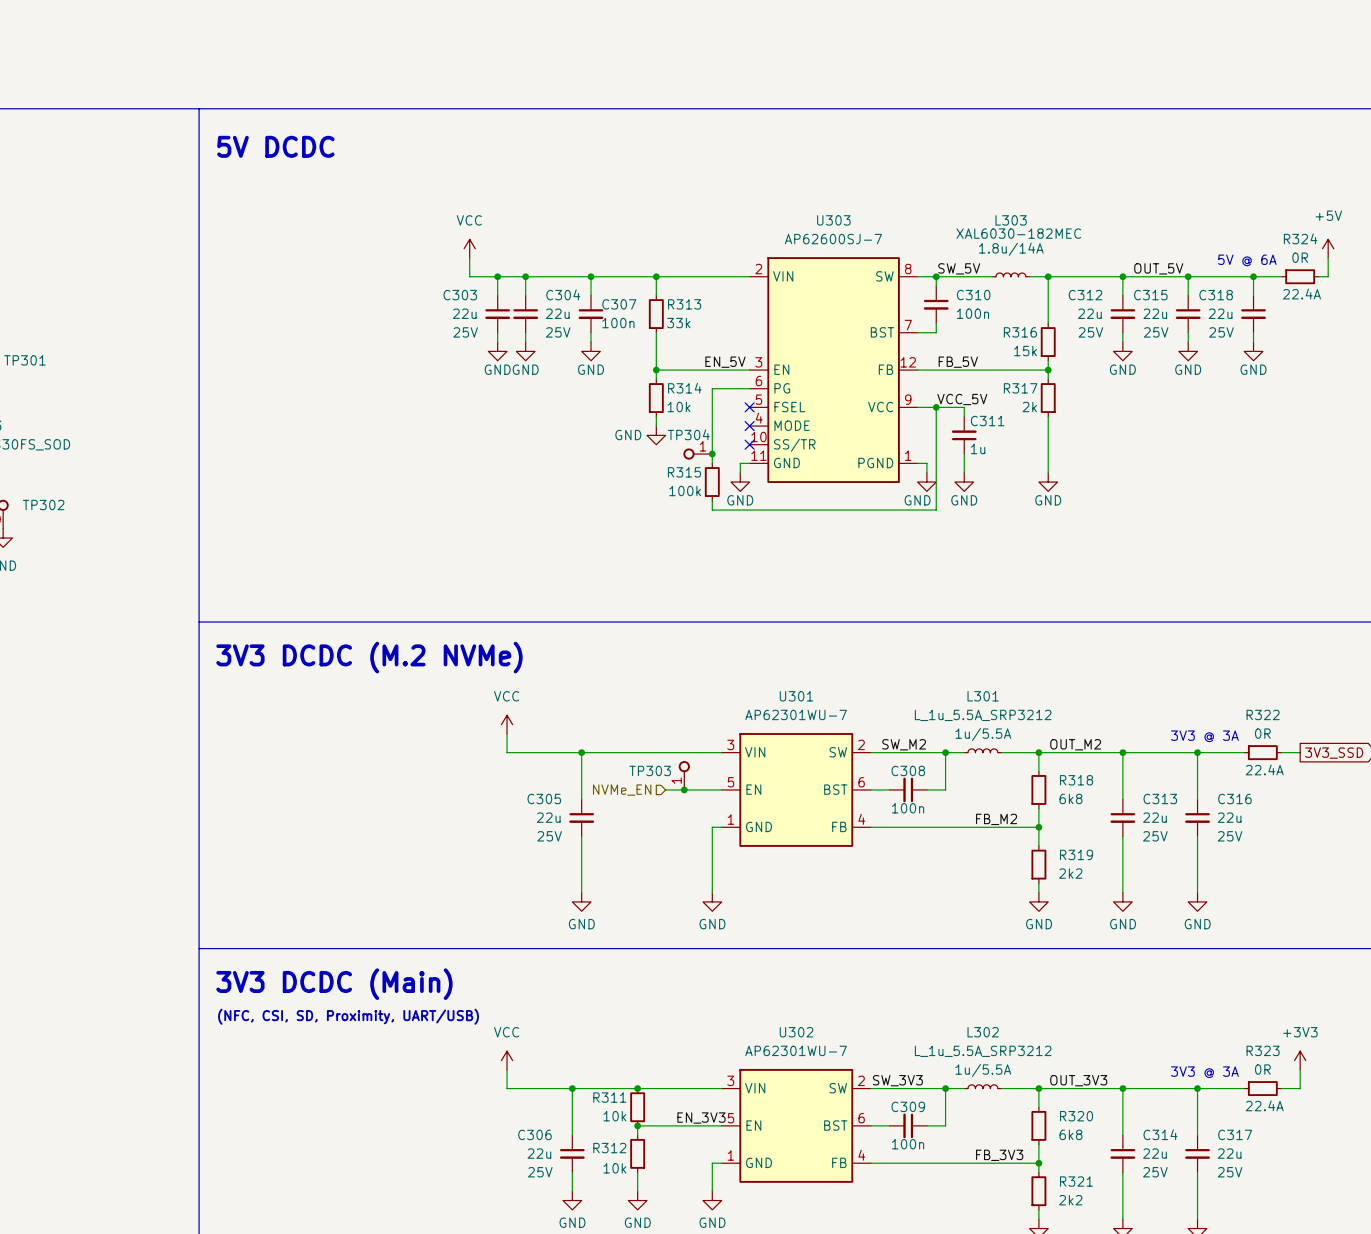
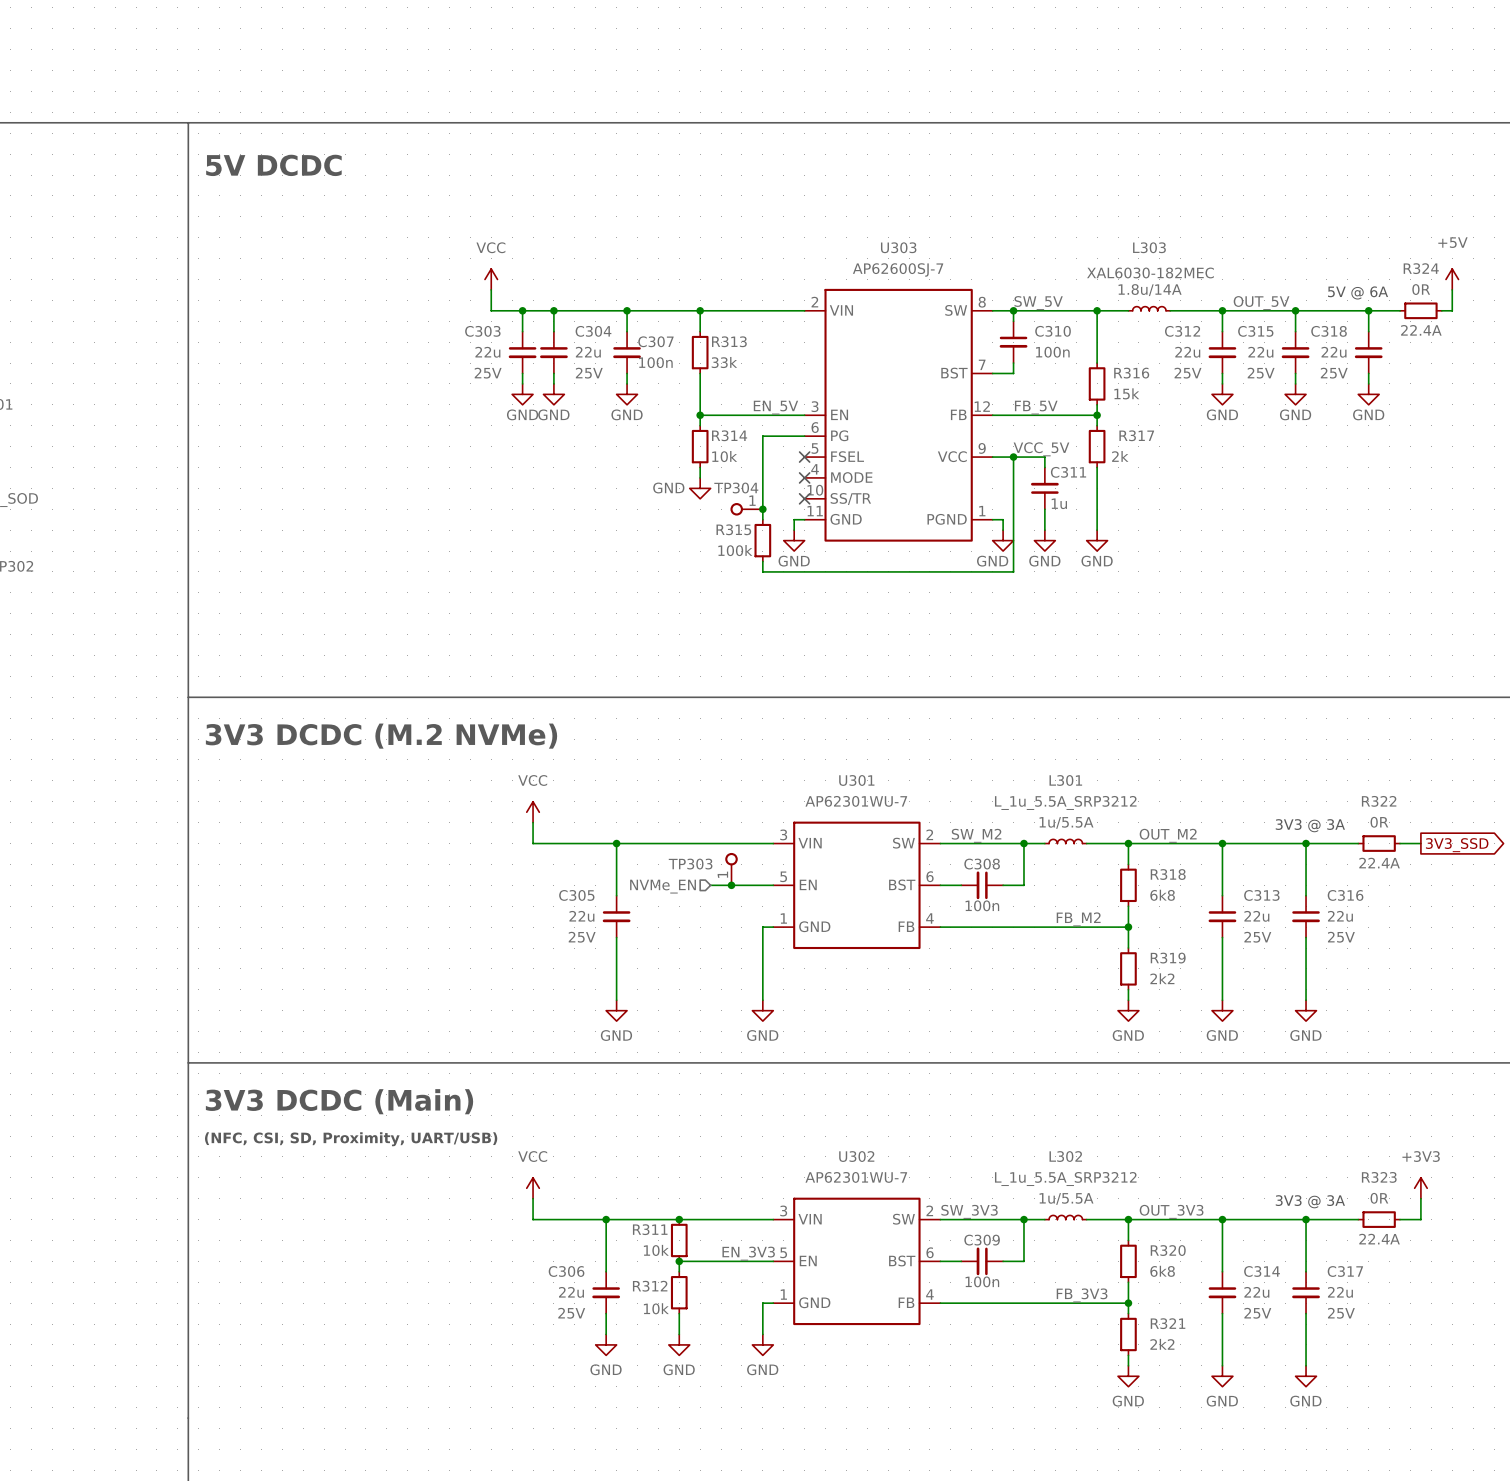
L303 text position: XAL6030-182MEC (1018, 233) -> XAL6030-182MEC (1150, 272)
L303 text position: 1.8u/14A (1011, 249) -> 1.8u/14A (1150, 290)
L303 position: (1010, 274) -> (1149, 308)
wire: (1038, 276) (1076, 276) -> (1076, 310) (1118, 310)
wire: (1048, 276) (1048, 323) -> (1097, 310) (1097, 363)
junction position: (1048, 276) -> (1097, 310)
R316 name position: R316 (1020, 332) -> R316 (1131, 373)
R316 position: (1048, 342) -> (1097, 383)
R316 text position: 15k (1025, 351) -> 15k (1126, 393)
wire: (1048, 360) (1048, 379) -> (1097, 404) (1097, 425)
wire: (1010, 370) (1048, 370) -> none
junction position: (1048, 370) -> (1097, 415)
R317 name position: R317 (1020, 388) -> R317 (1136, 435)
R317 position: (1048, 398) -> (1097, 446)
wire: (1048, 416) (1048, 472) -> (1097, 467) (1097, 530)
power symbol position: GND (1048, 482) -> GND (1097, 540)

